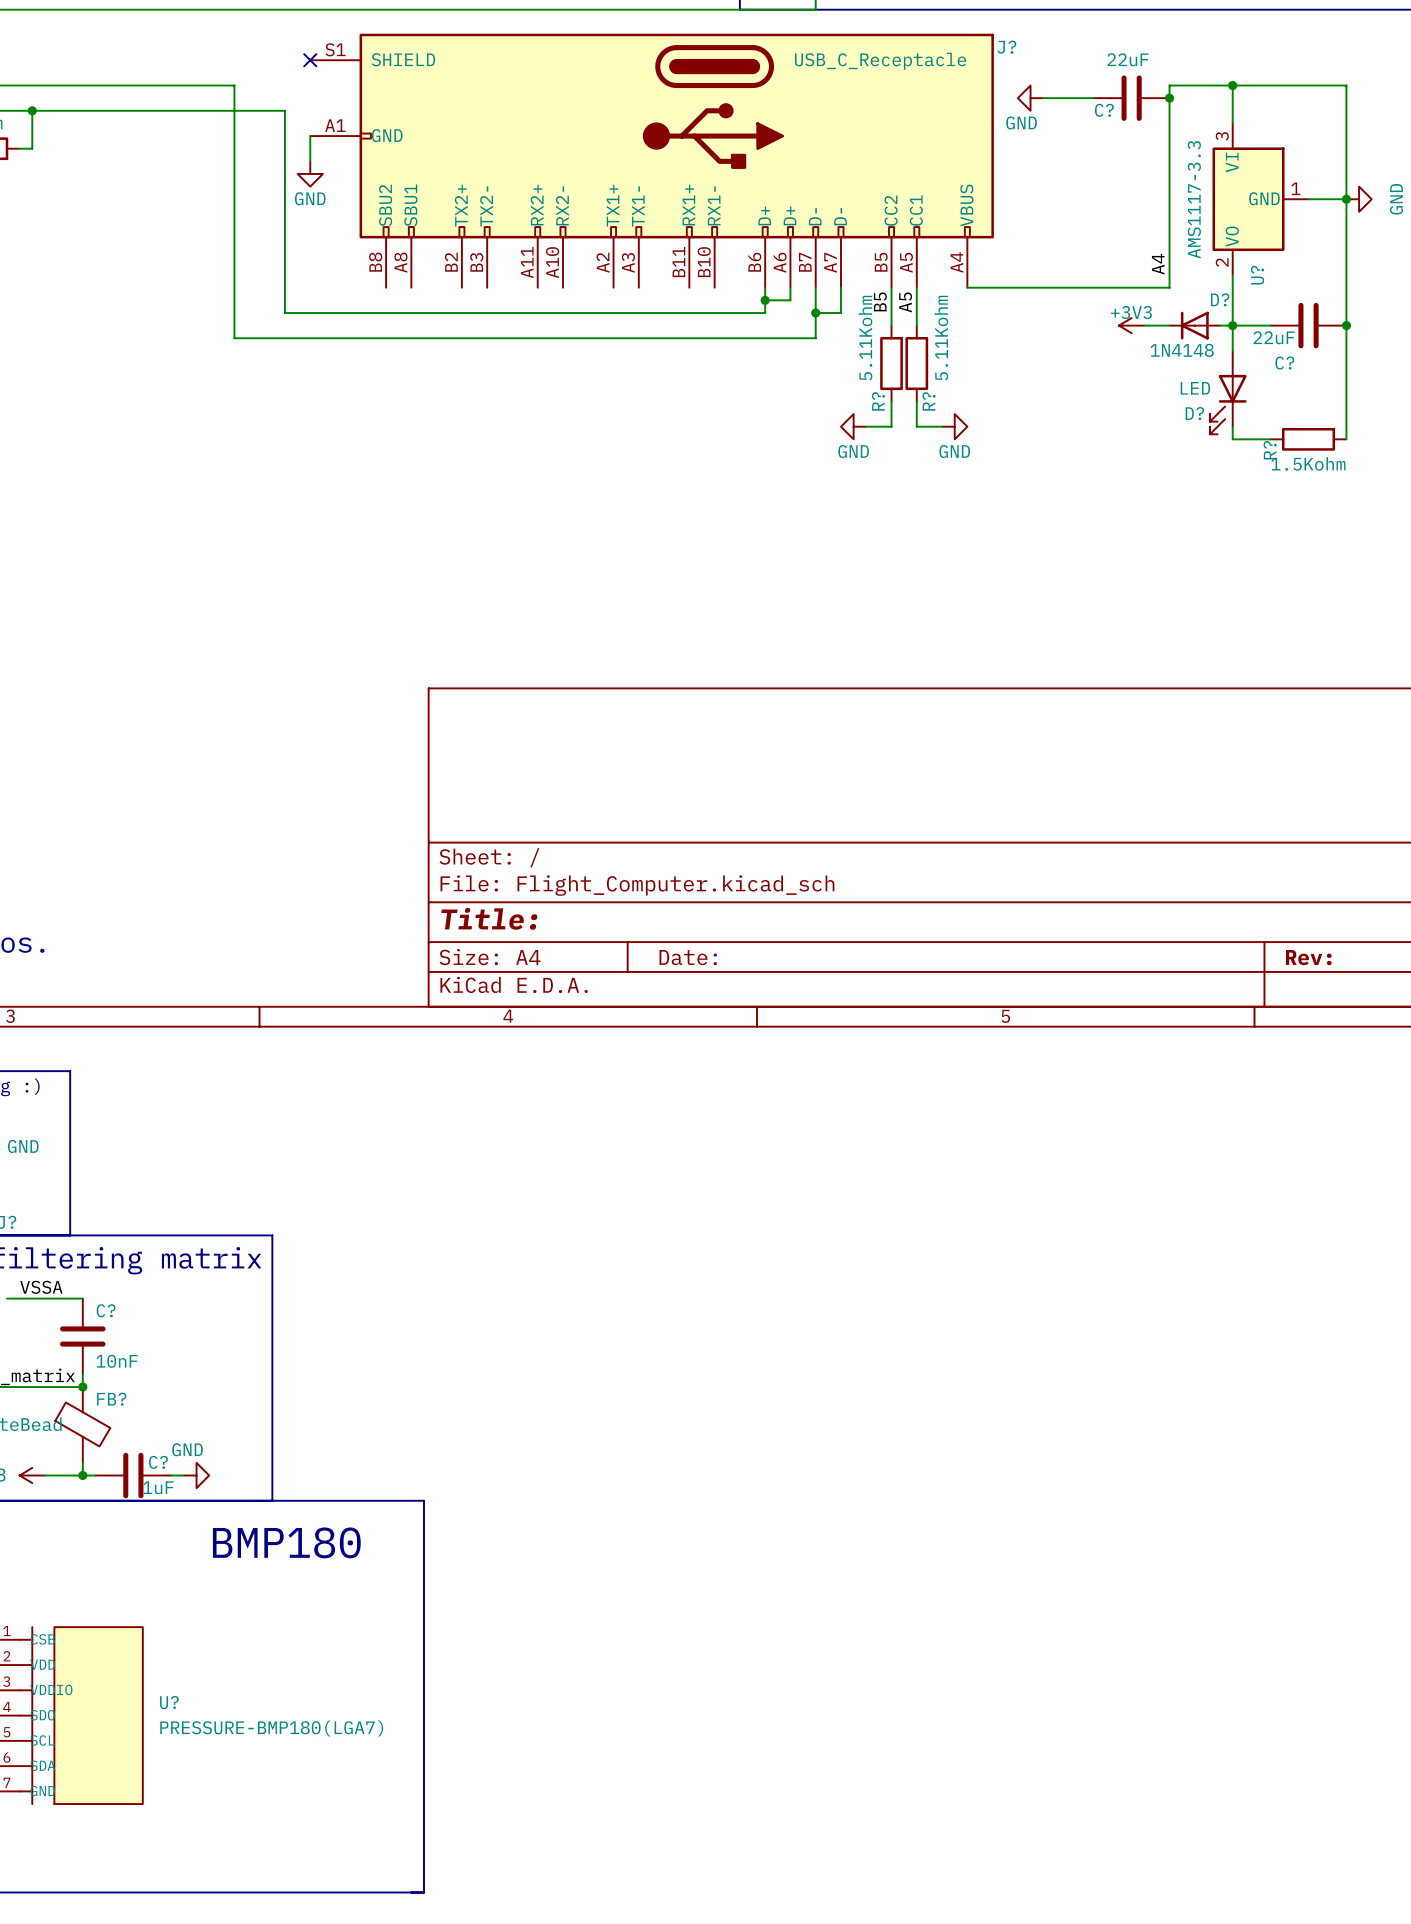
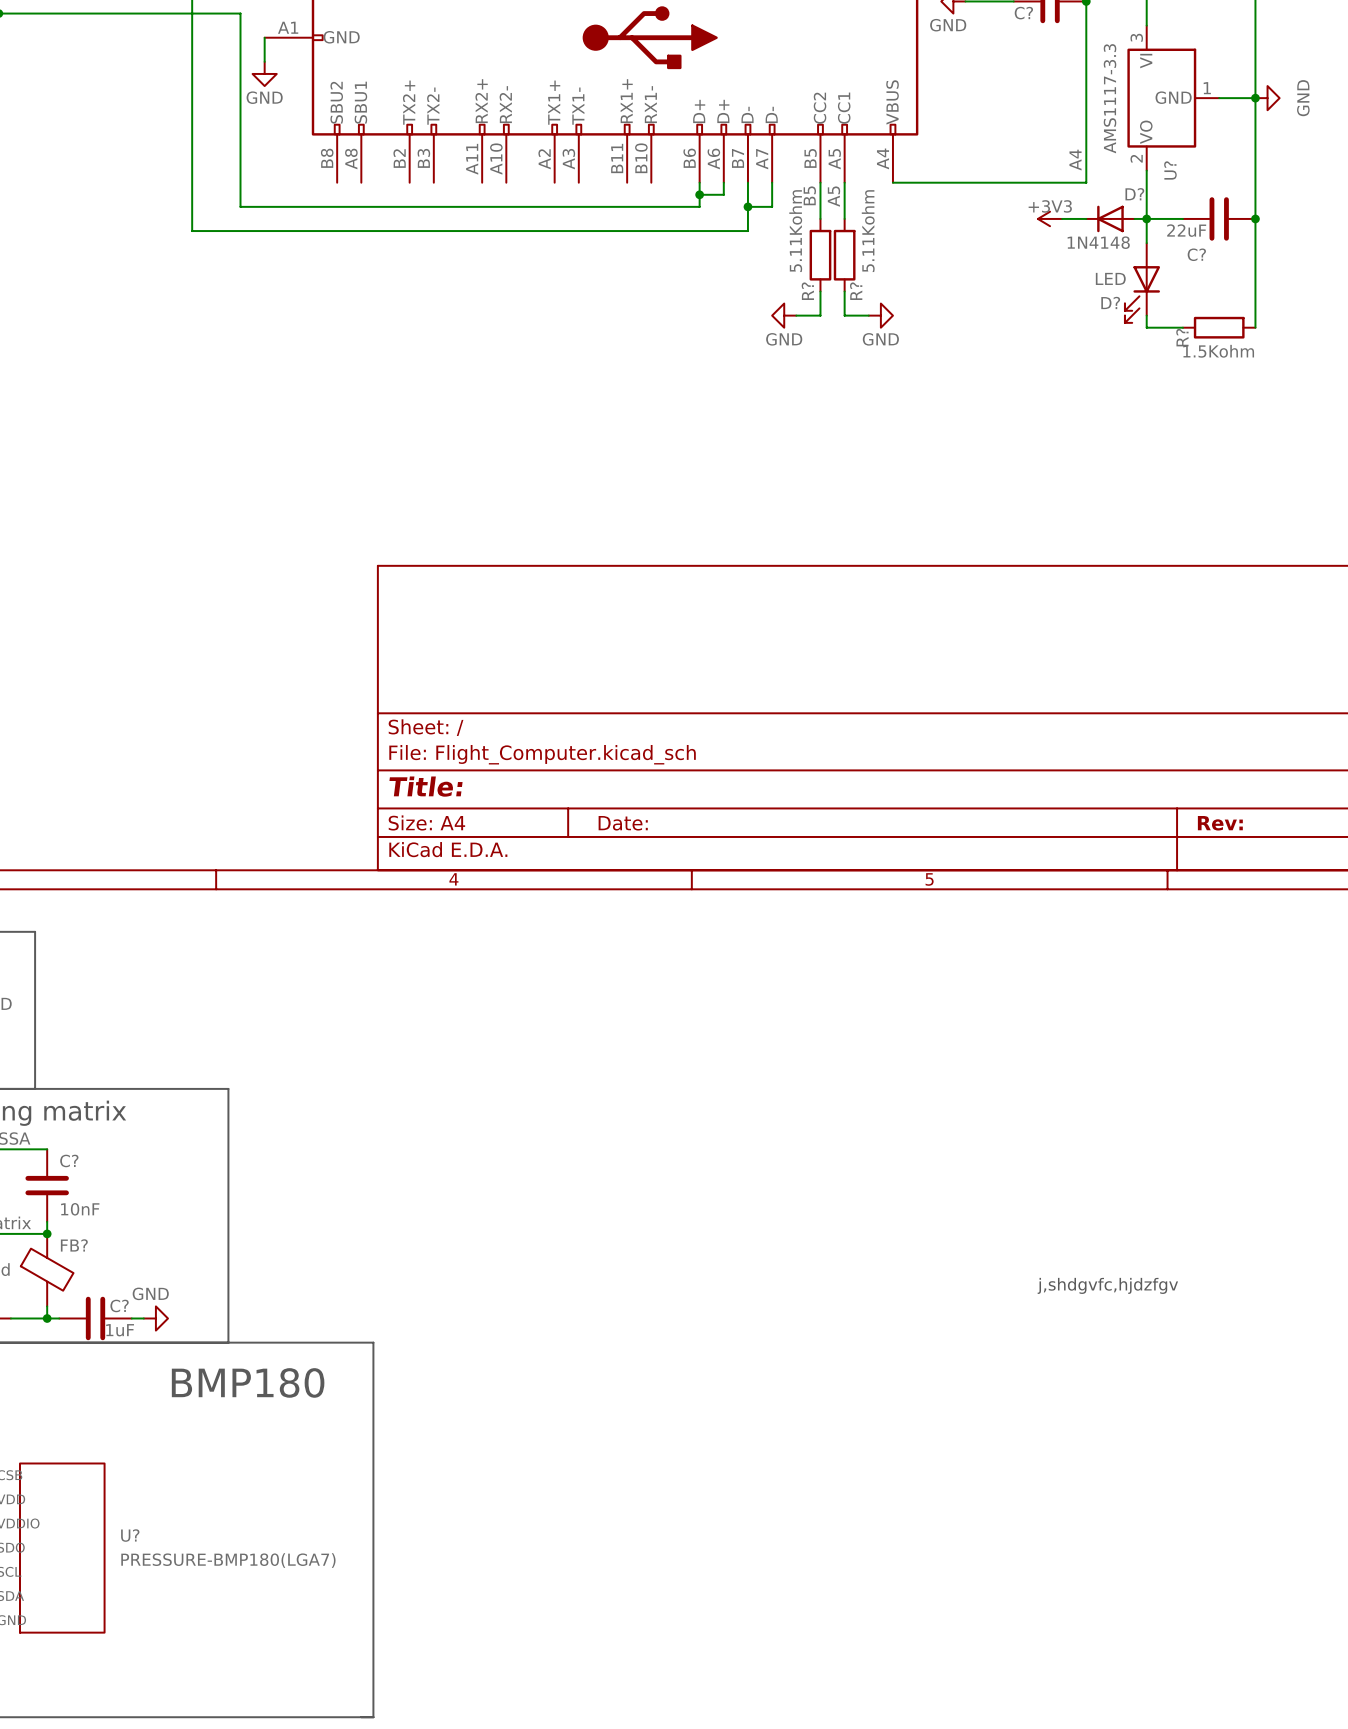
text: none -> j,shdgvfc,hjdzfgv (1107, 1285)

